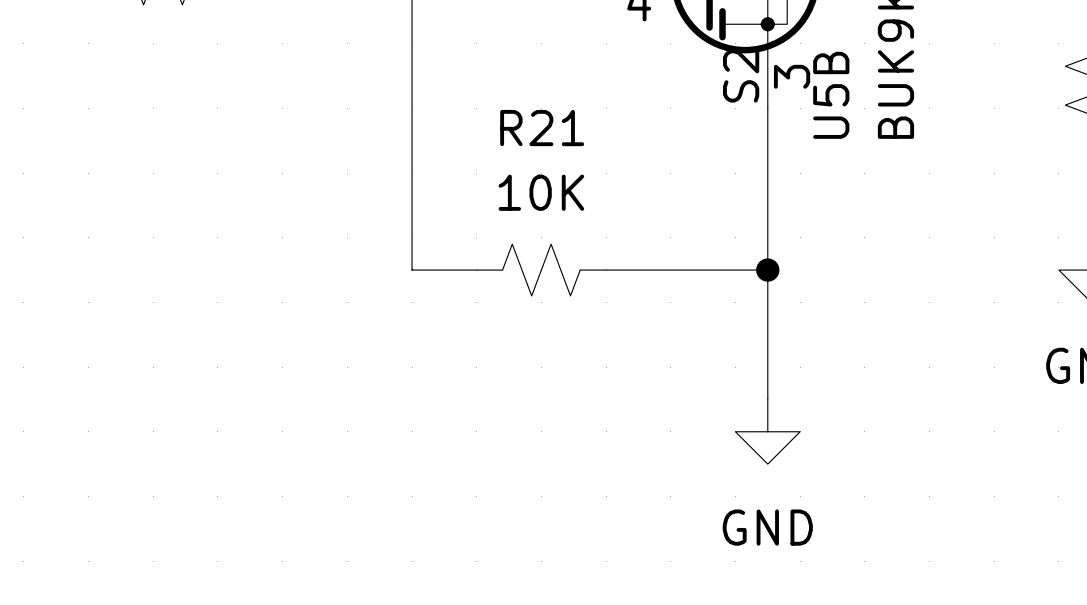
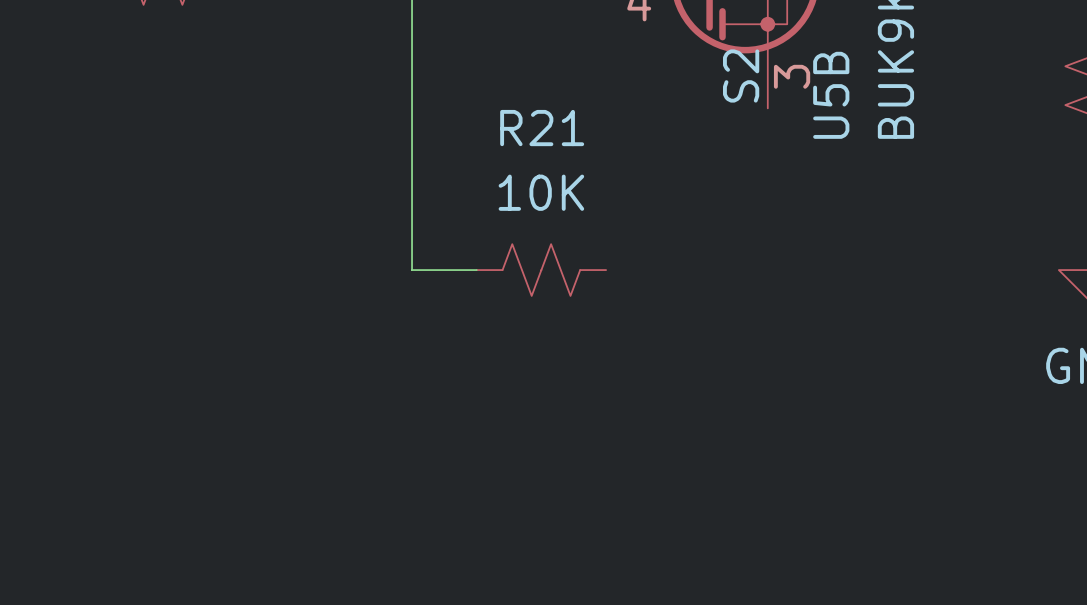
wire: (767, 108) (767, 399) -> none
wire: (606, 270) (767, 270) -> none
junction: (767, 270) -> none
power symbol: GND (767, 431) -> none

